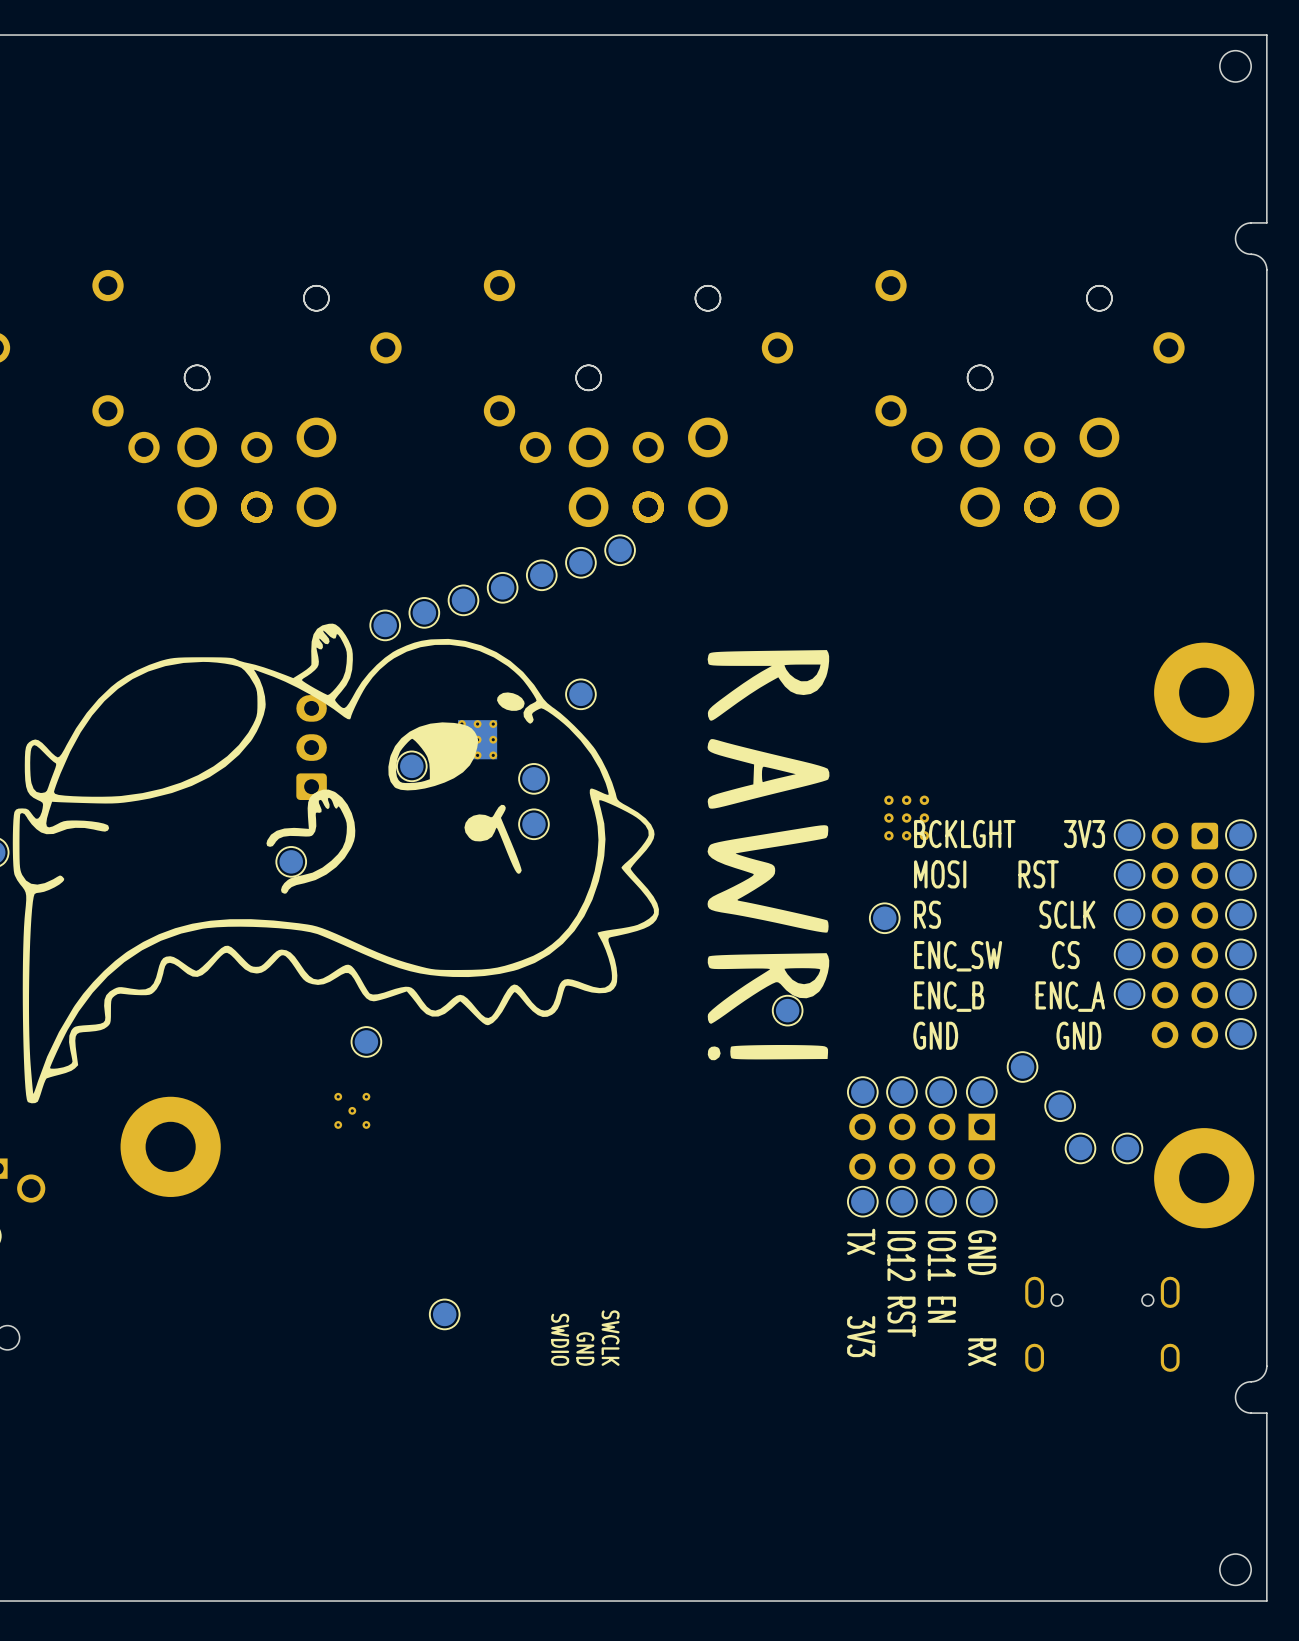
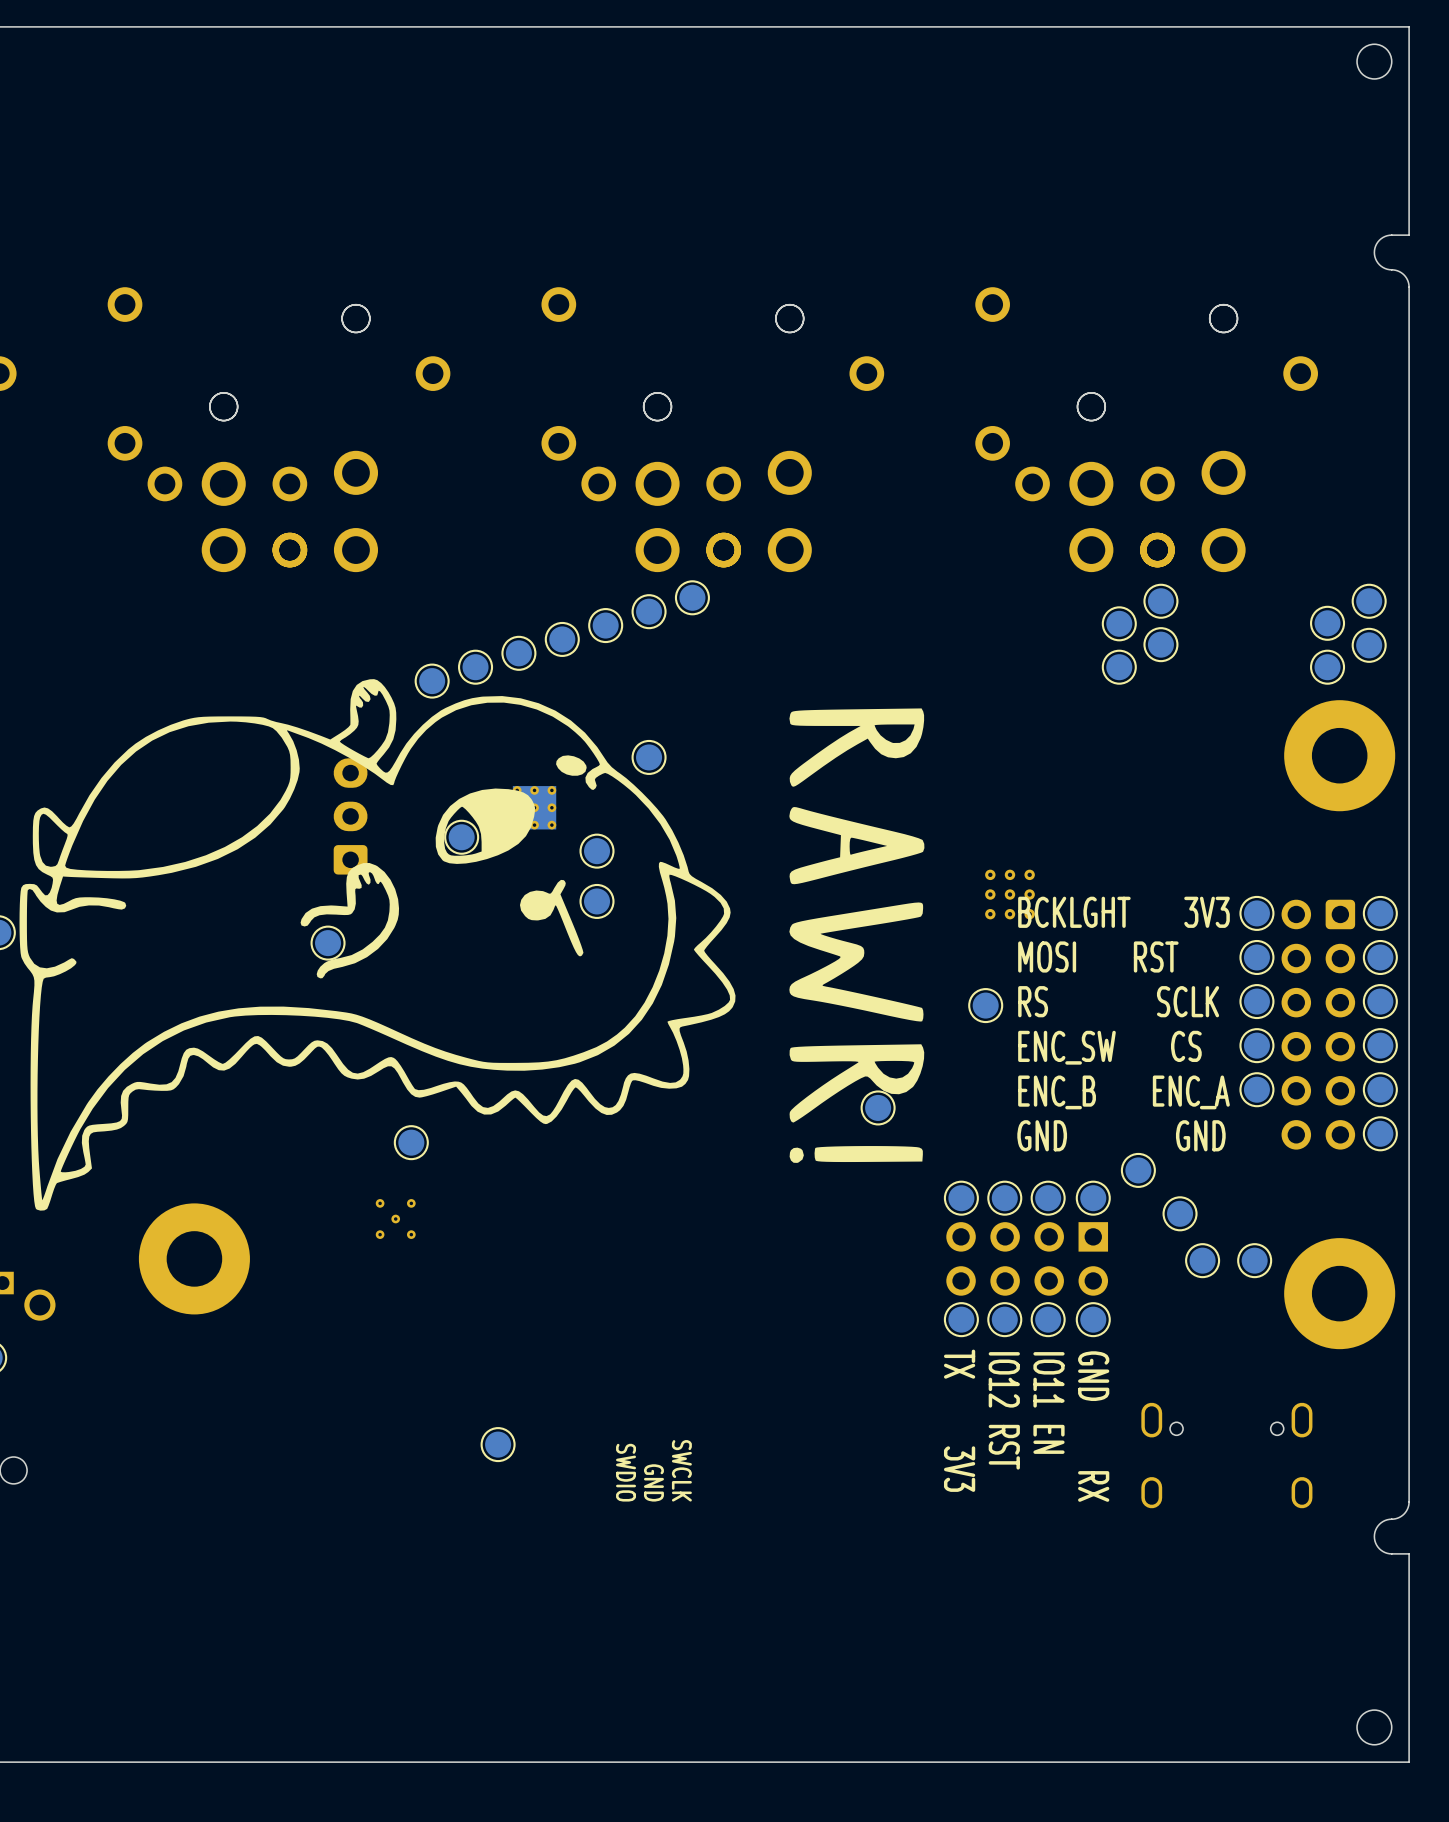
part: none -> (1160, 601)
part: none -> (1369, 601)
part: none -> (1119, 623)
part: none -> (1327, 623)
part: none -> (1160, 644)
part: none -> (1369, 645)
part: none -> (1119, 667)
part: none -> (1327, 667)

